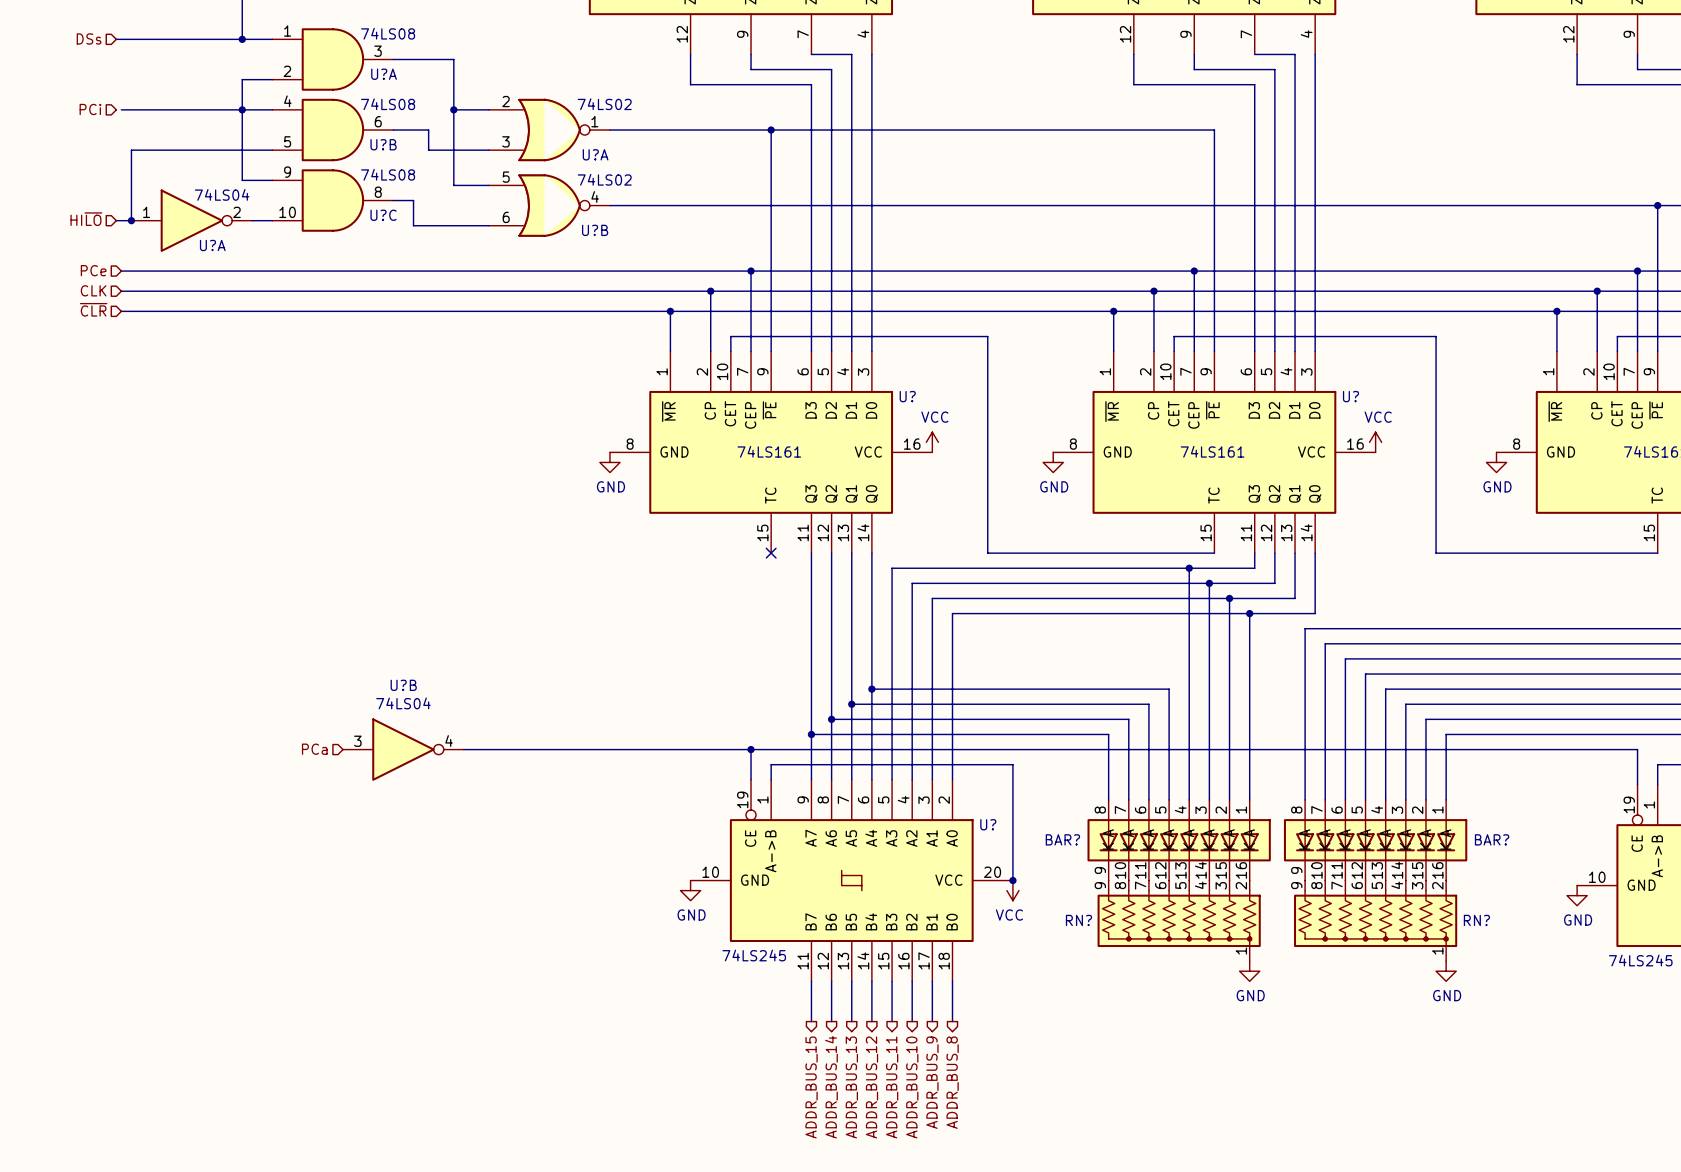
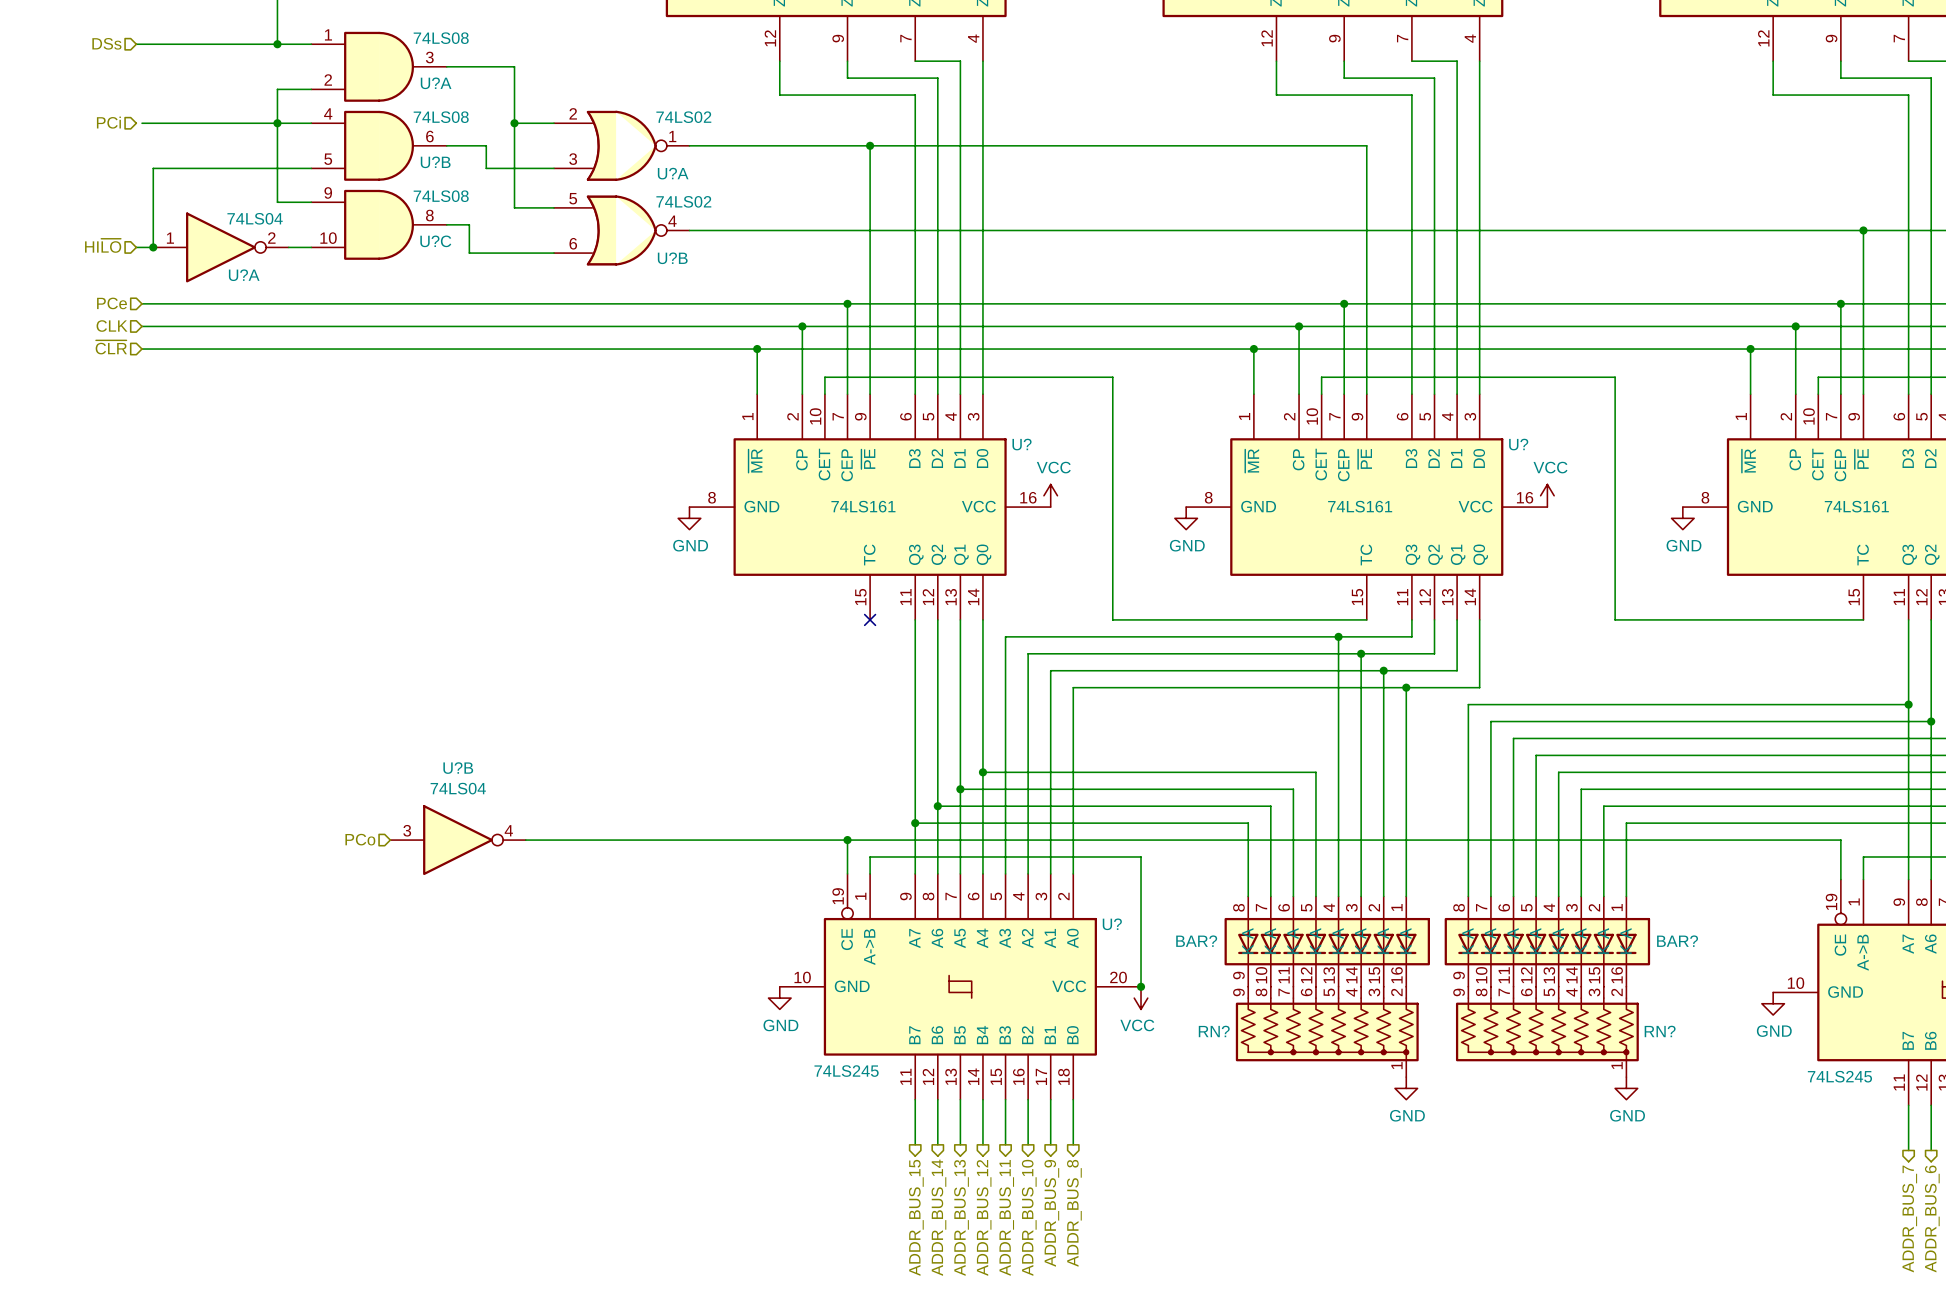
hierarchical label: PCa (314, 749) -> PCo (360, 839)

